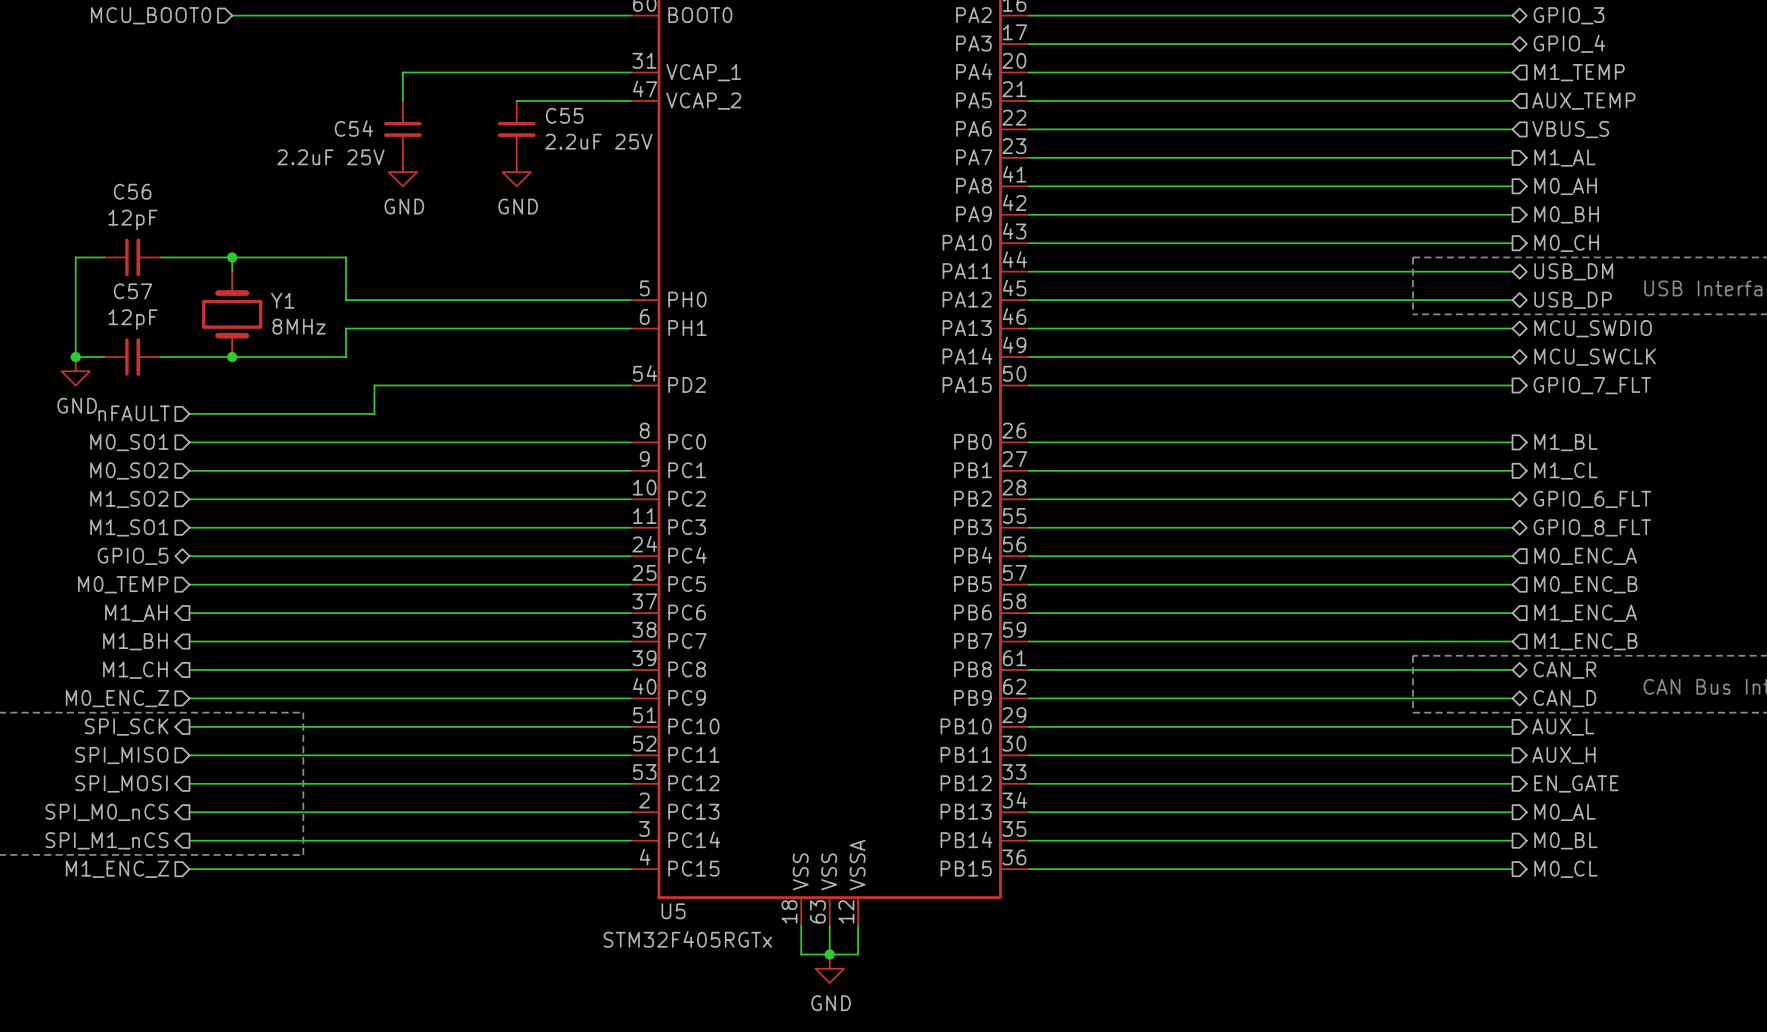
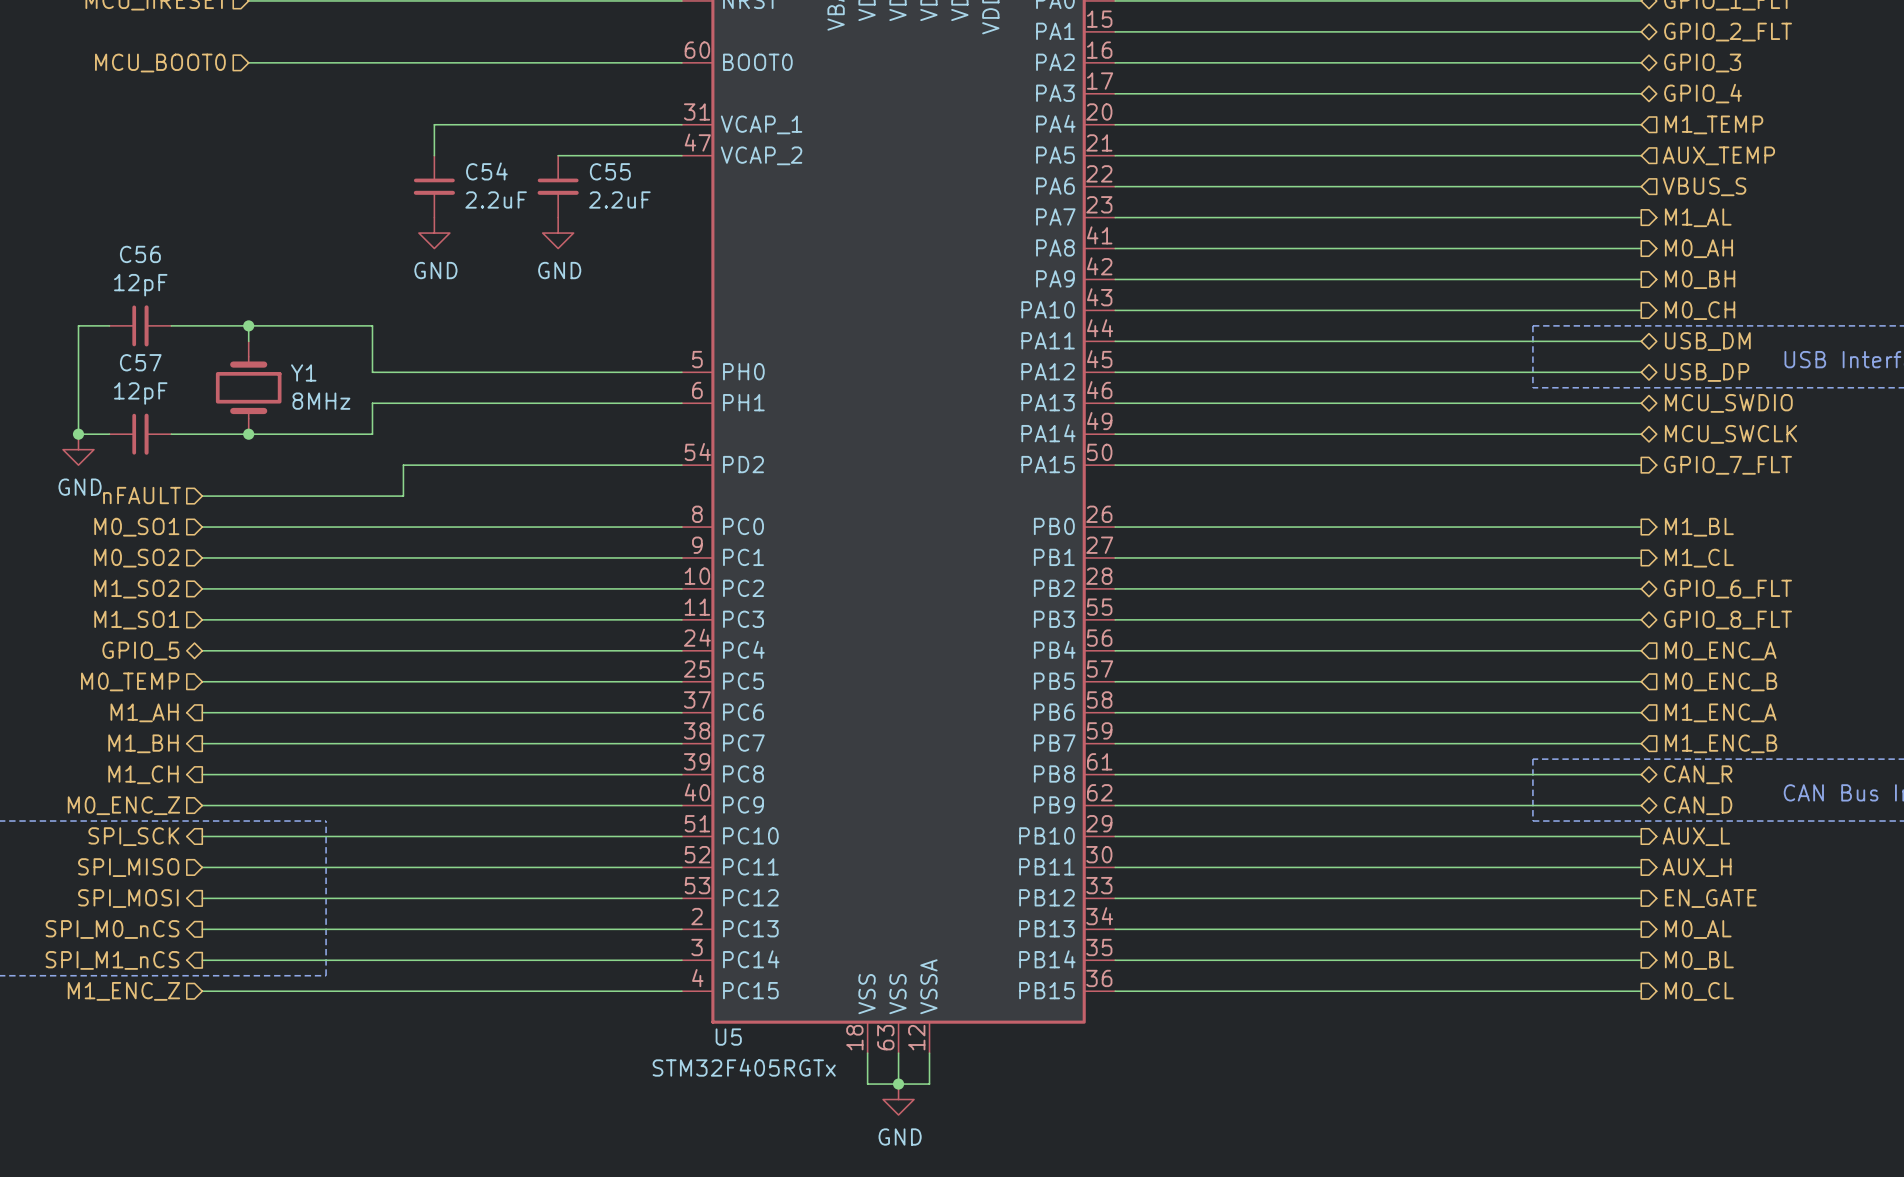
C54 name position: C54 (353, 128) -> C54 (486, 171)
C55 value: 2.2uF 25V (598, 141) -> 2.2uF (619, 199)
C54 value: 2.2uF 25V (330, 157) -> 2.2uF (496, 199)

